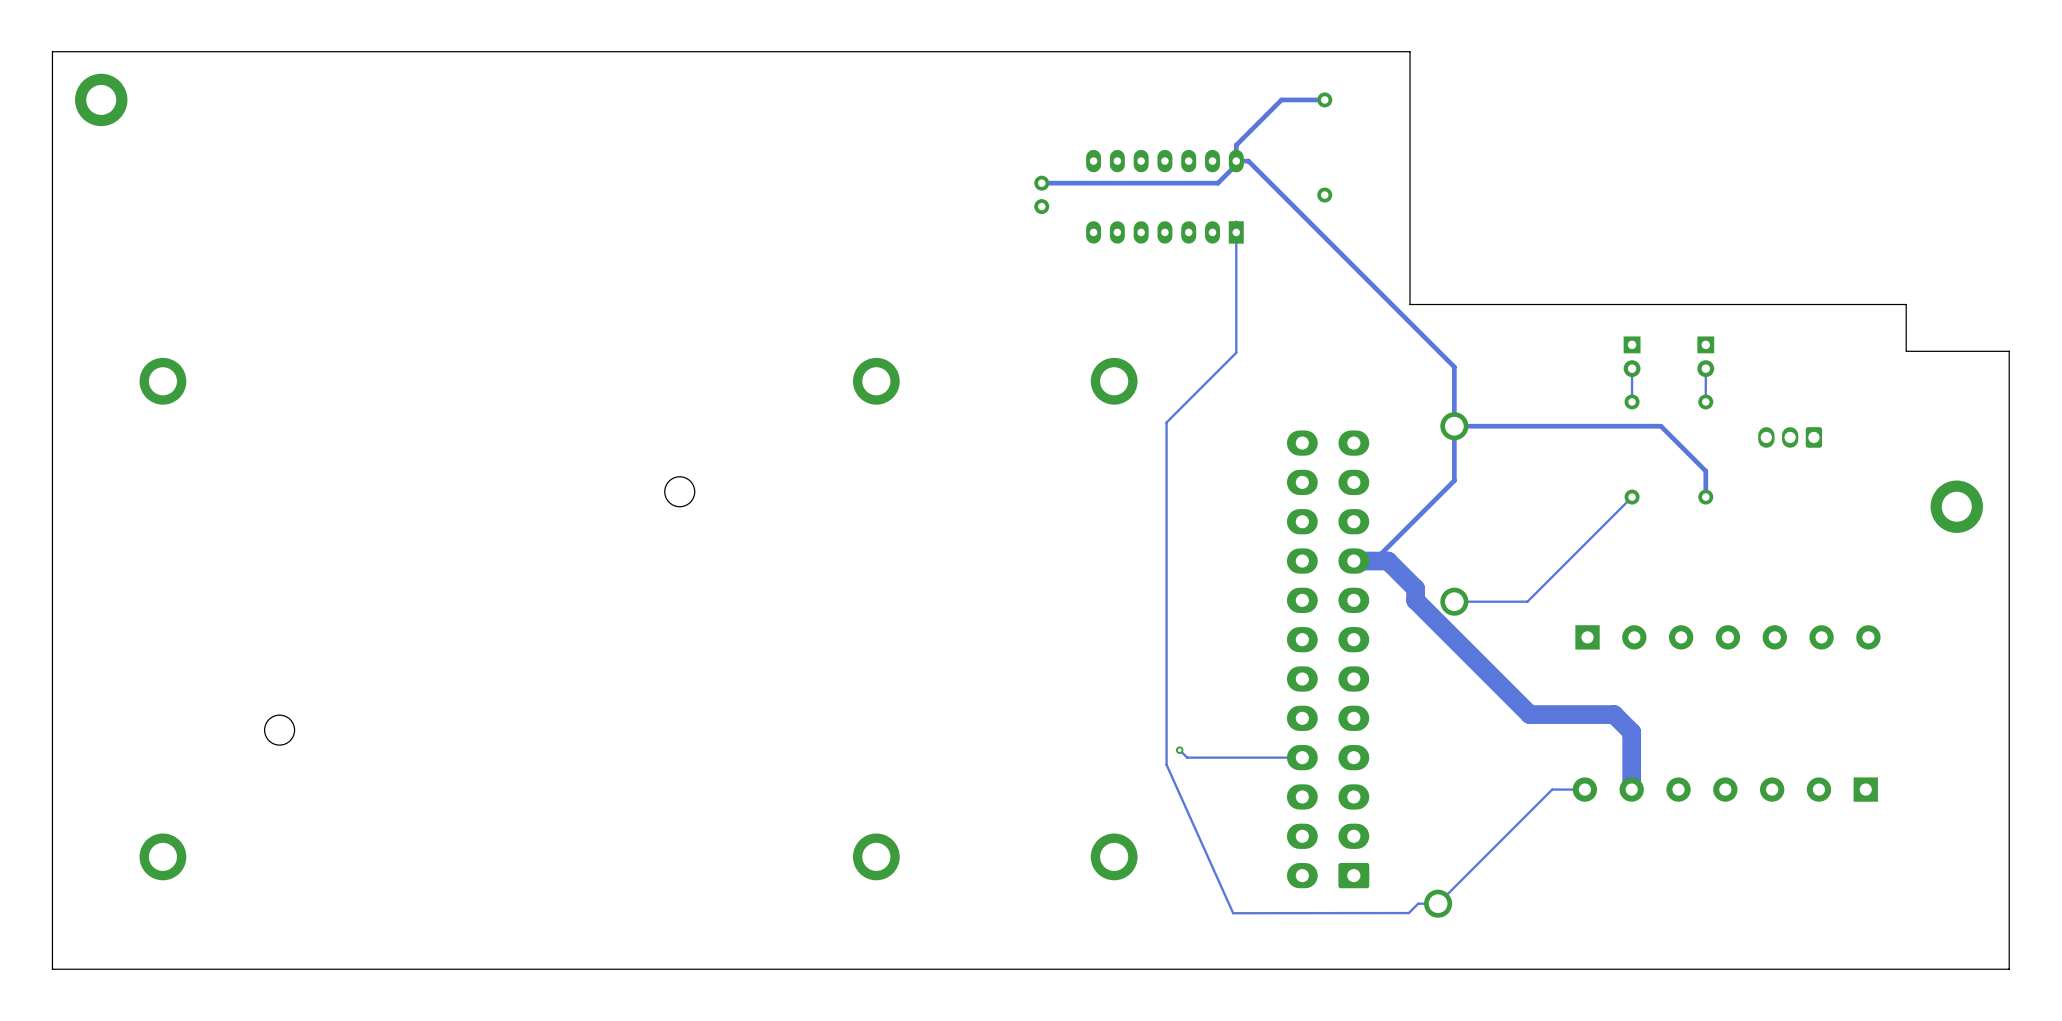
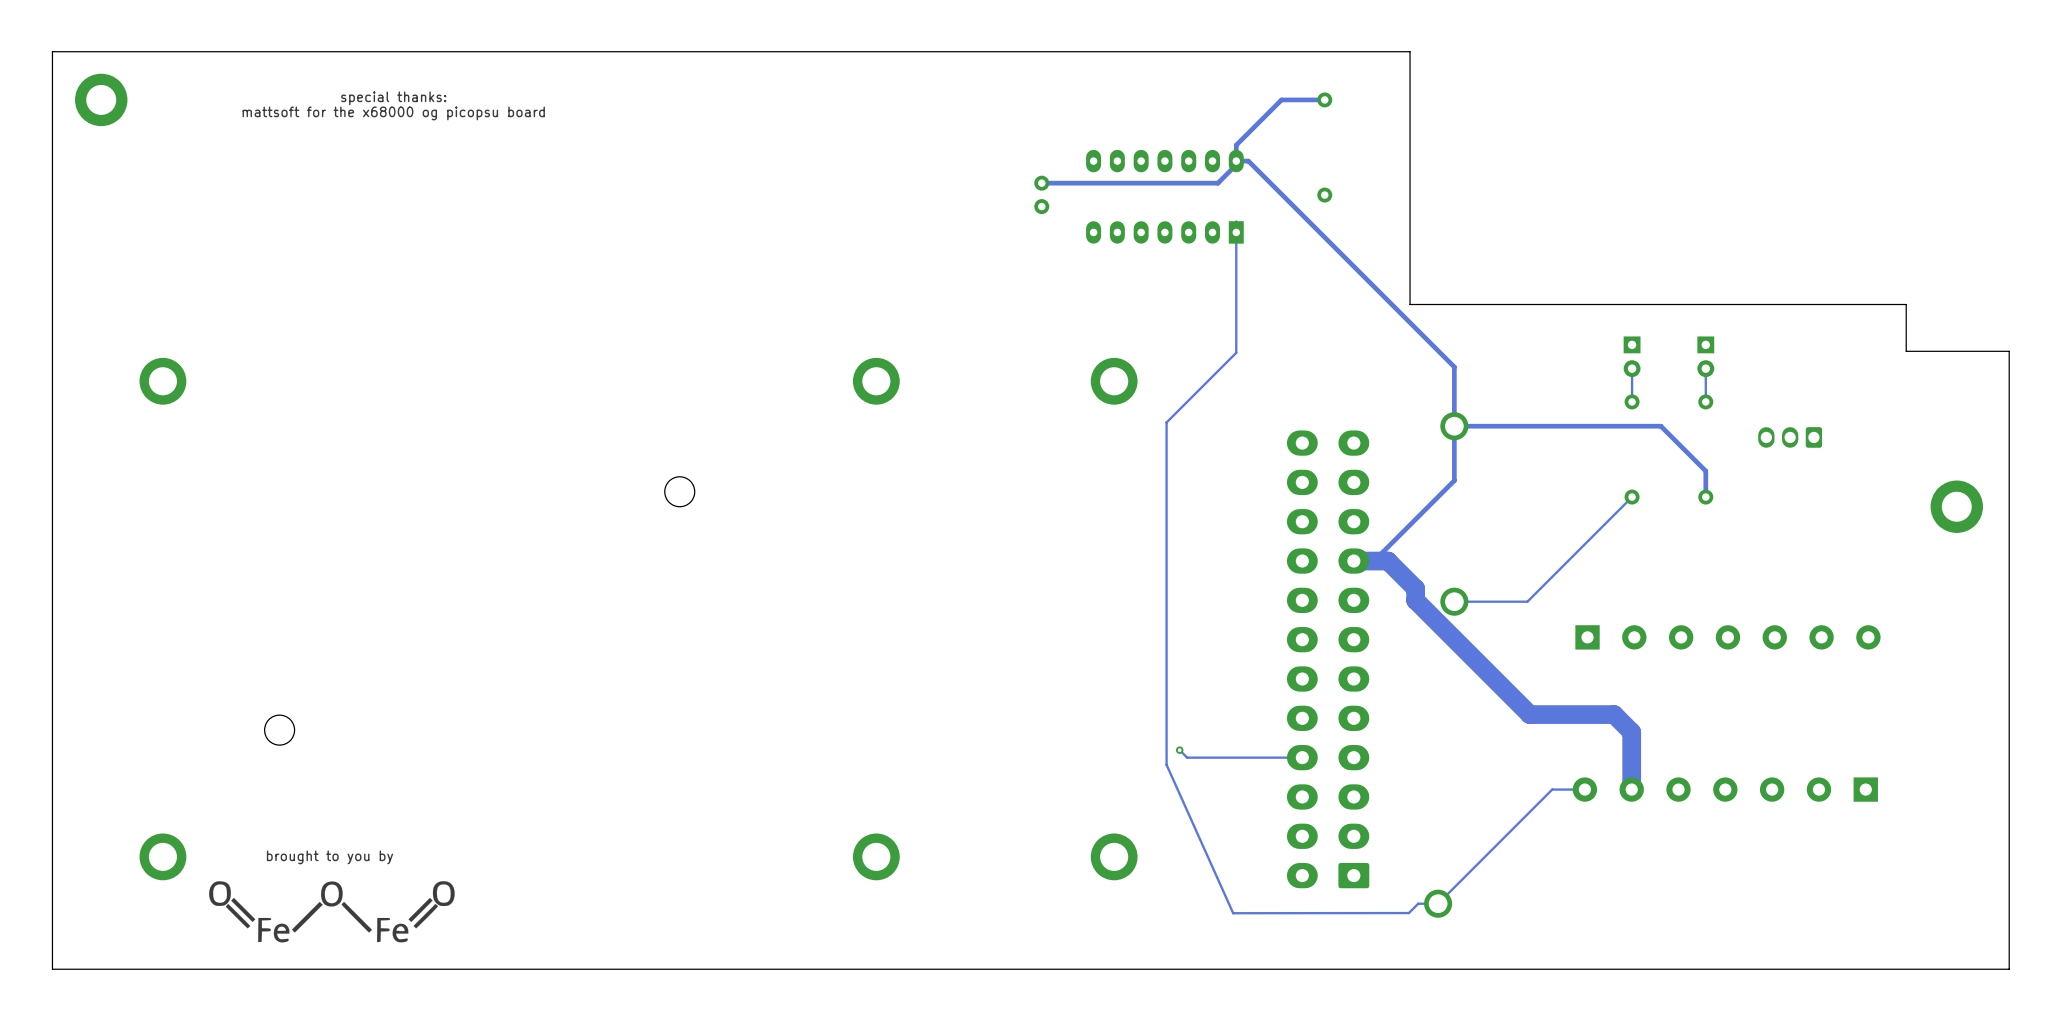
text: none -> special thanks: (393, 98)
text: none -> mattsoft for the x68000 og picopsu board (393, 113)
text: none -> brought to you by (329, 857)
drawing: none -> [209, 881, 455, 943]

